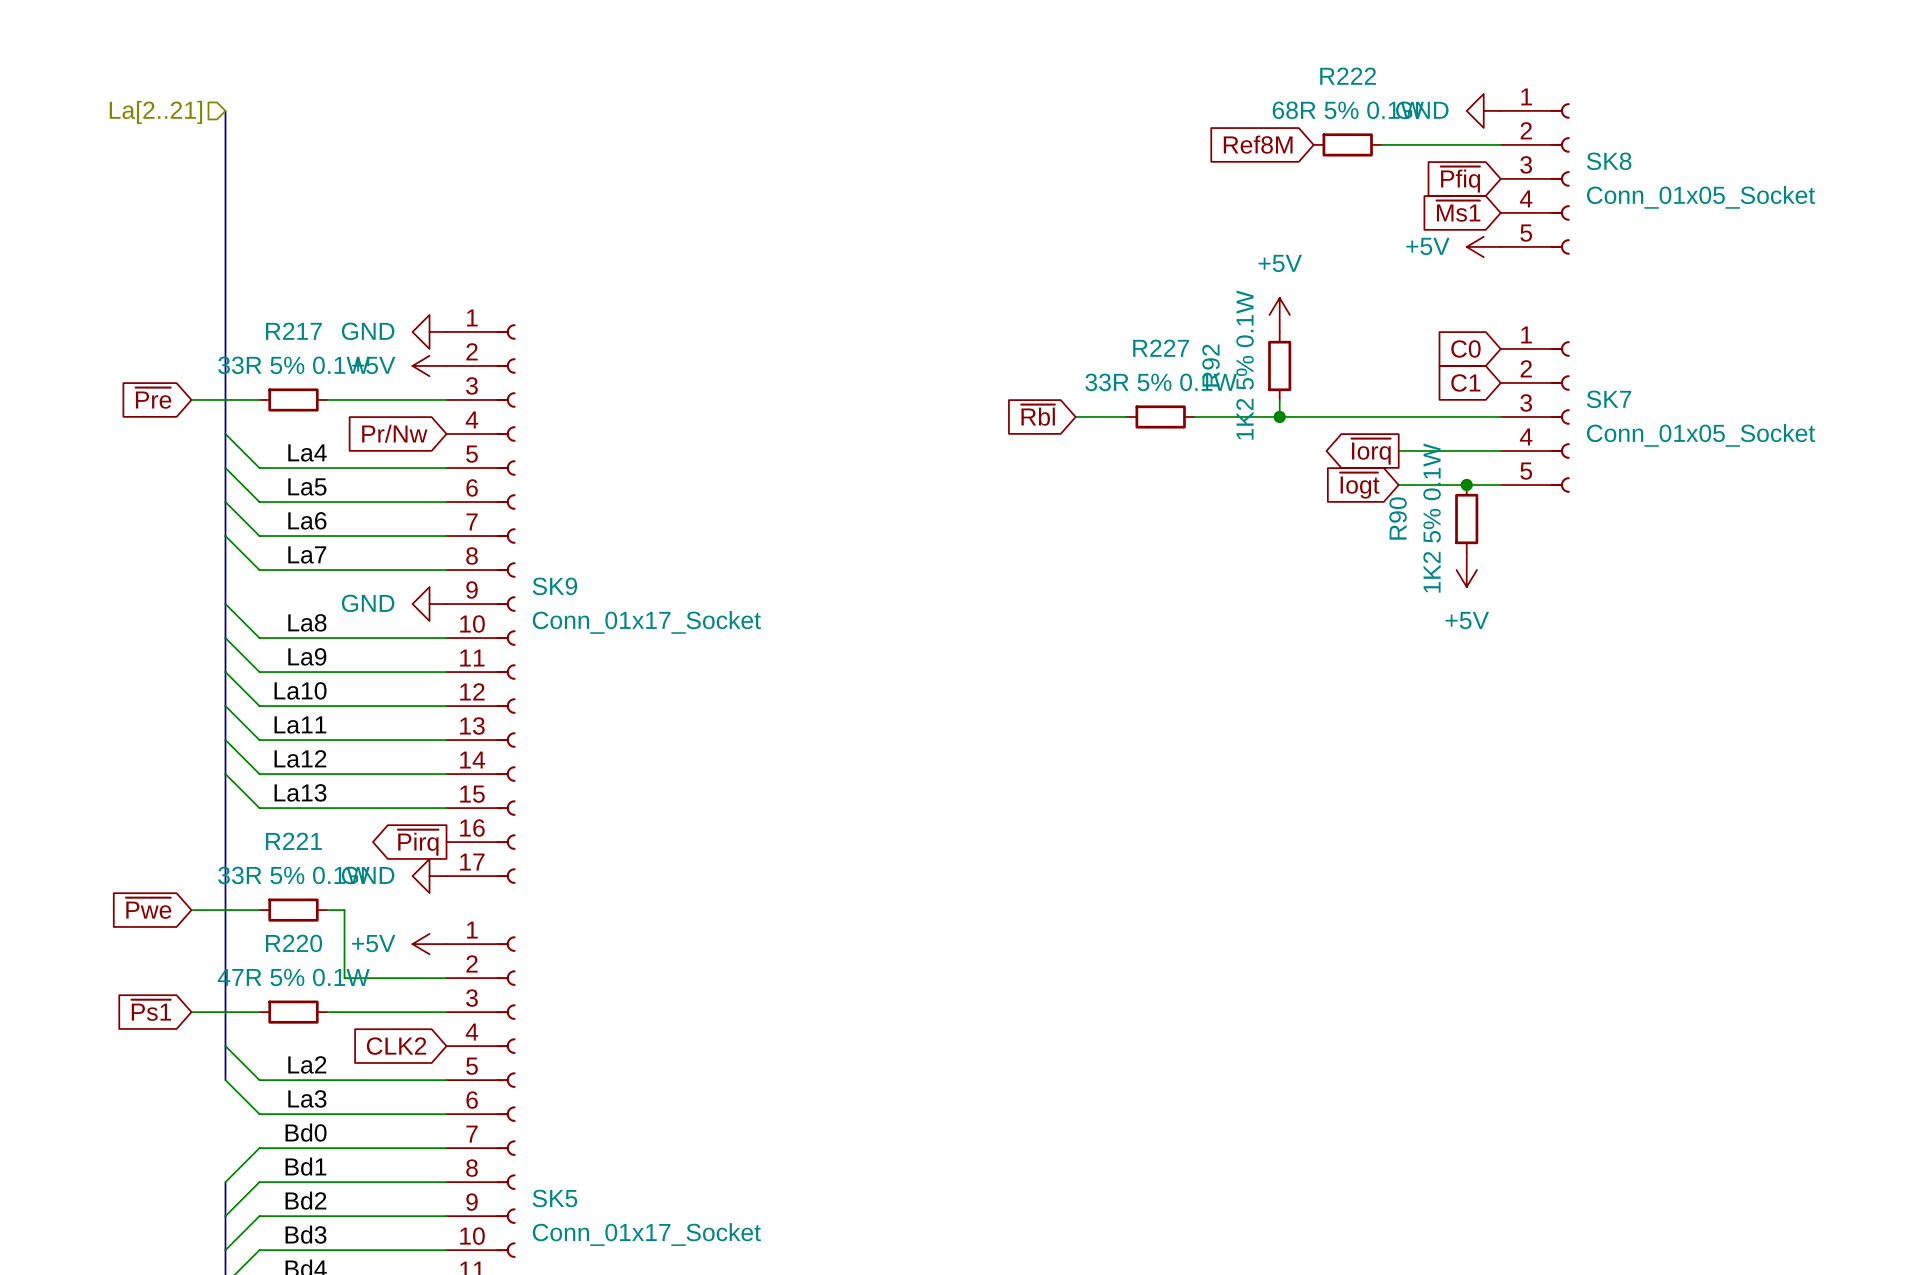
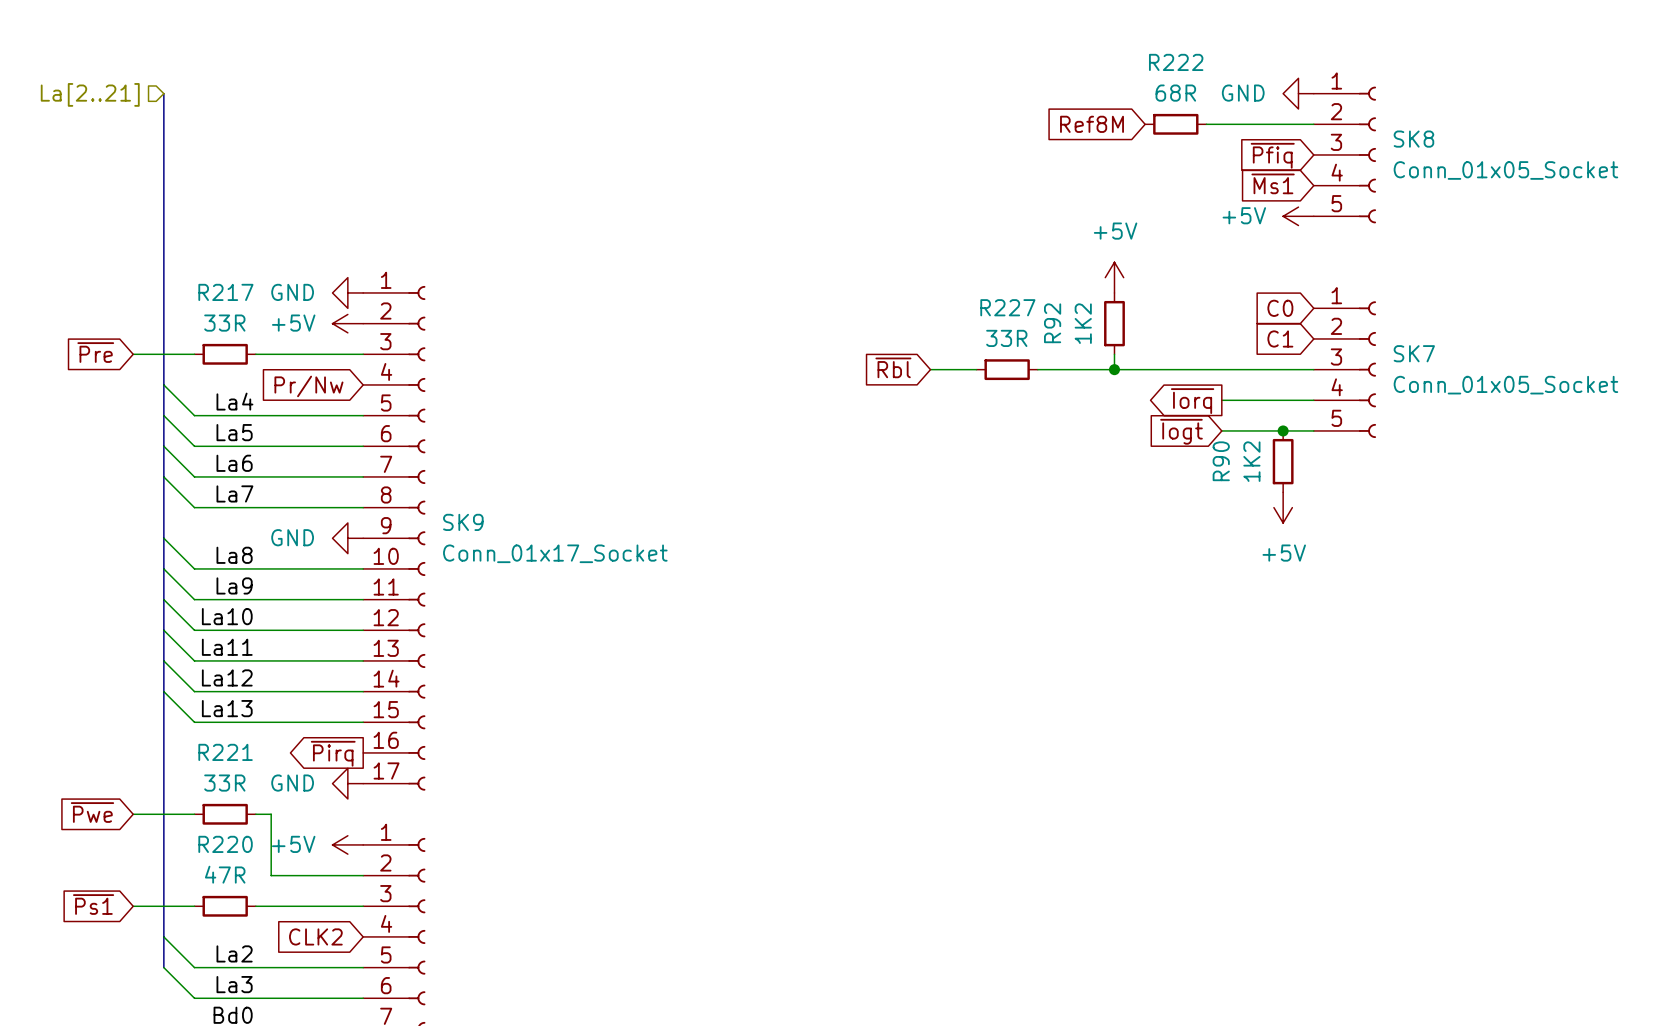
R222 value: 68R 5% 0.1W (1348, 110) -> 68R (1175, 93)
R217 value: 33R 5% 0.1W (293, 365) -> 33R (224, 323)
R92 value: 1K2 5% 0.1W (1245, 365) -> 1K2 (1083, 323)
R227 value: 33R 5% 0.1W (1161, 382) -> 33R (1006, 338)
R90 value: 1K2 5% 0.1W (1432, 518) -> 1K2 (1251, 461)
R221 value: 33R 5% 0.1W (293, 875) -> 33R (224, 783)
R220 value: 47R 5% 0.1W (293, 977) -> 47R (225, 874)

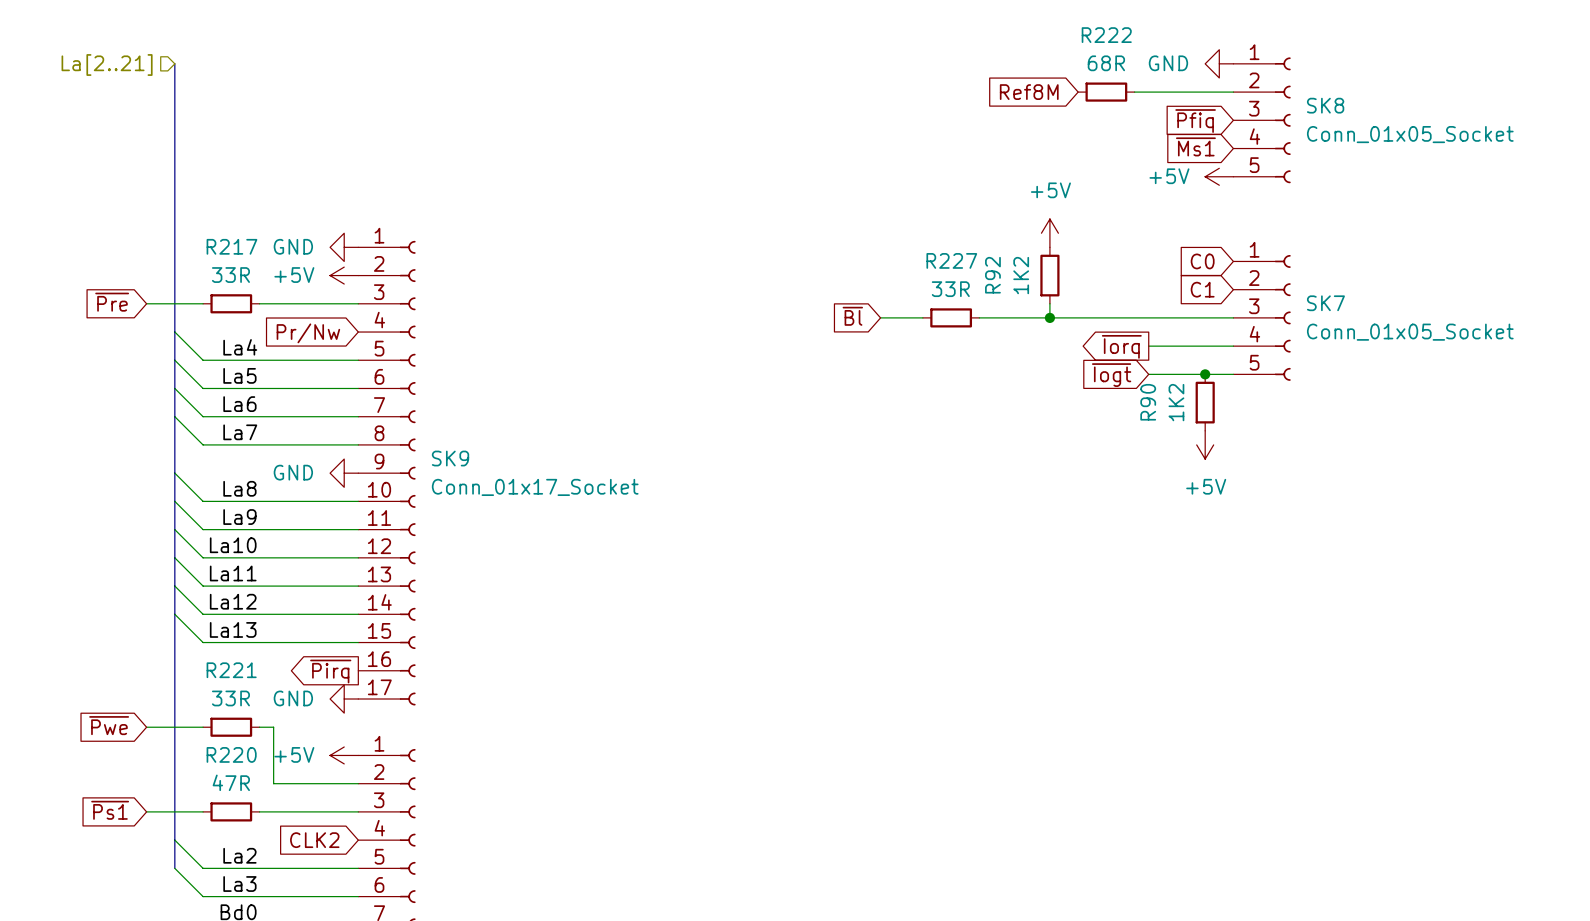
global label: ~{Rbl} (893, 367) -> ~{Bl} (852, 316)

